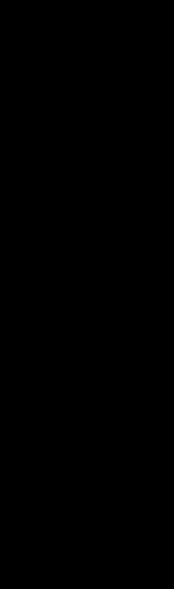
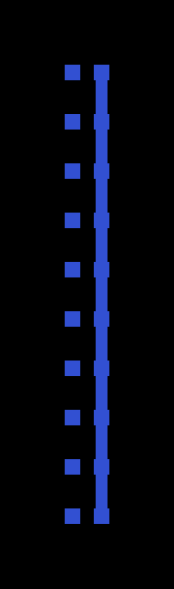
part: none -> (87, 72)
bottom track: none -> (101, 72) (101, 516)
part: none -> (87, 121)
part: none -> (87, 171)
part: none -> (87, 220)
part: none -> (87, 269)
part: none -> (87, 318)
part: none -> (87, 368)
part: none -> (87, 417)
part: none -> (87, 466)
part: none -> (87, 516)

